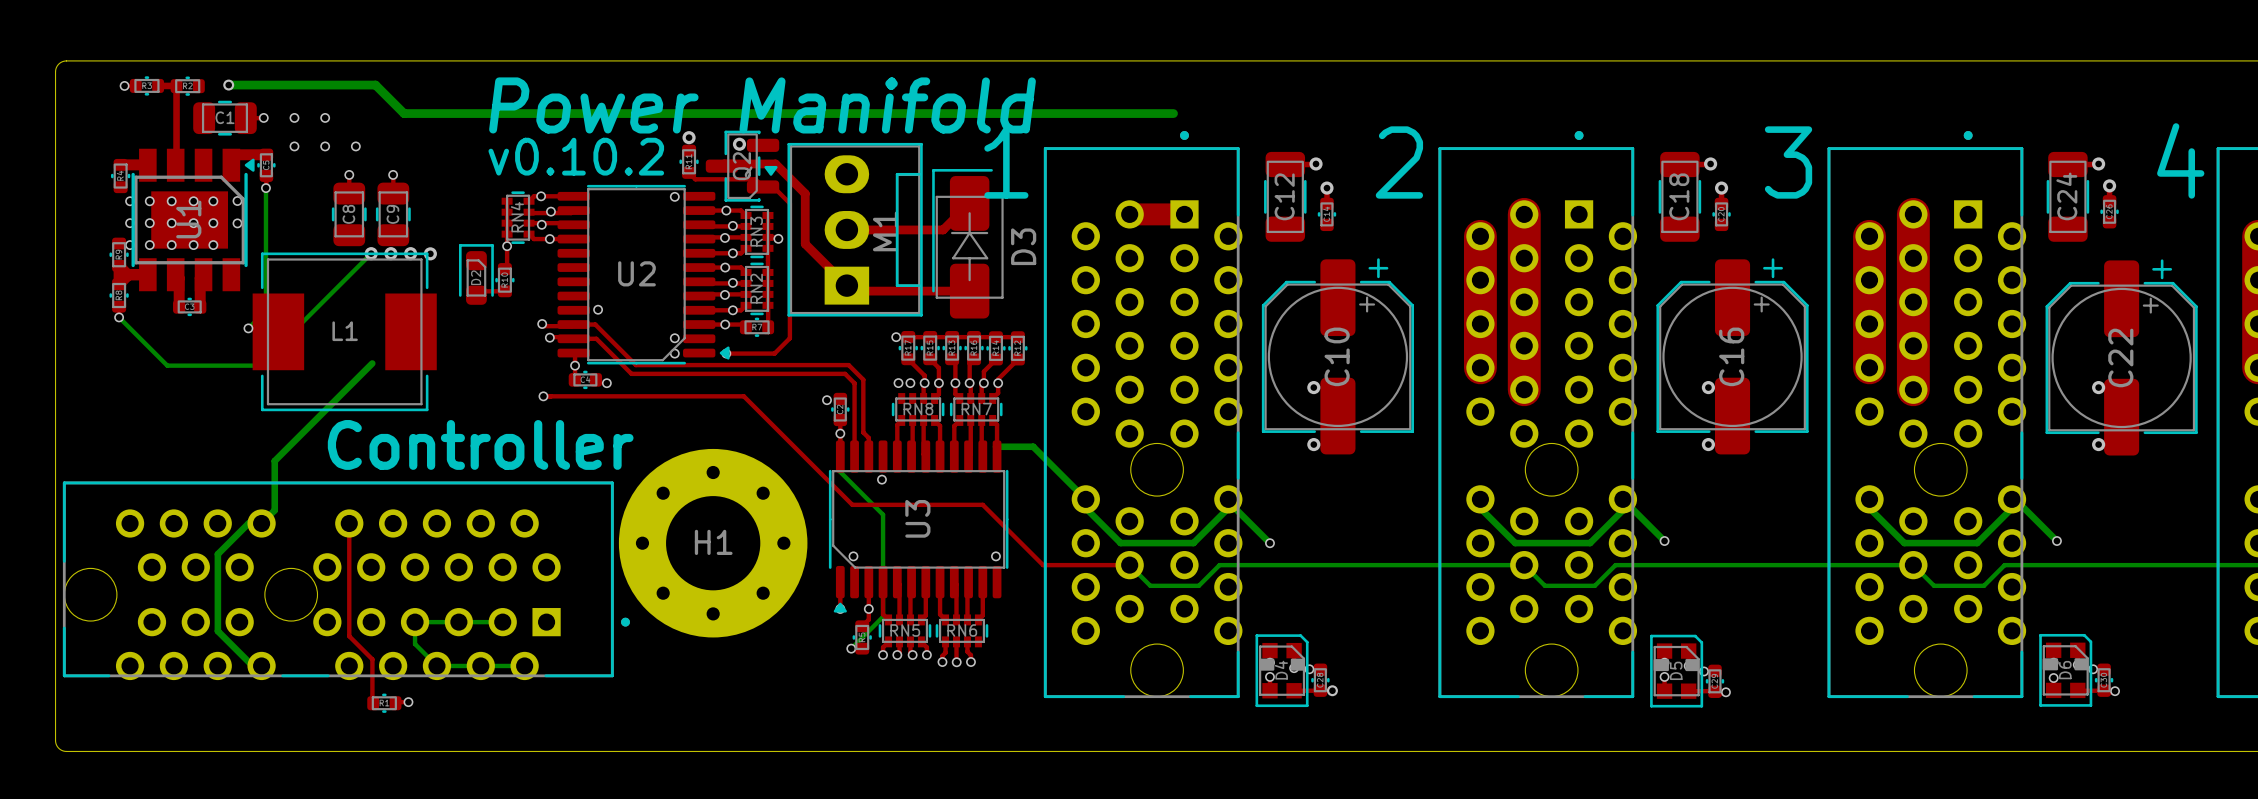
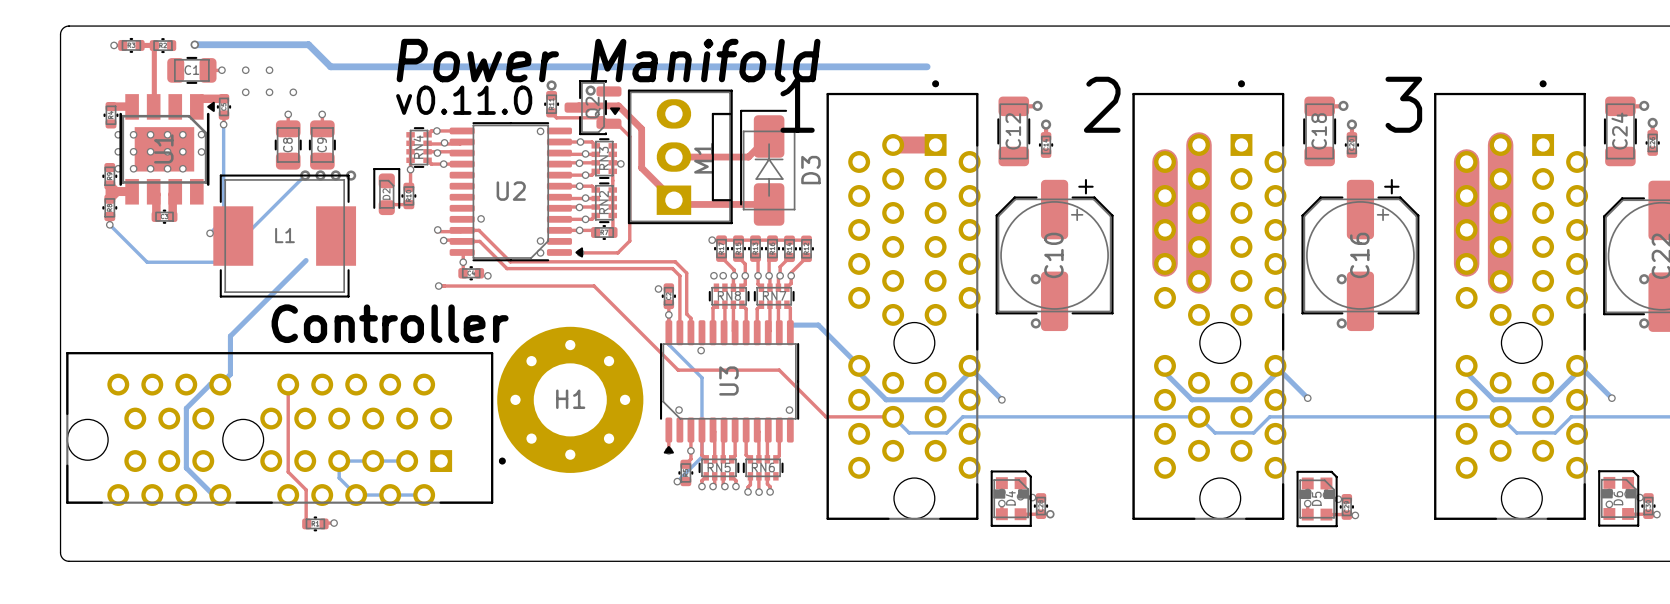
text: v0.10.2 (576, 156) -> v0.11.0 (464, 100)

